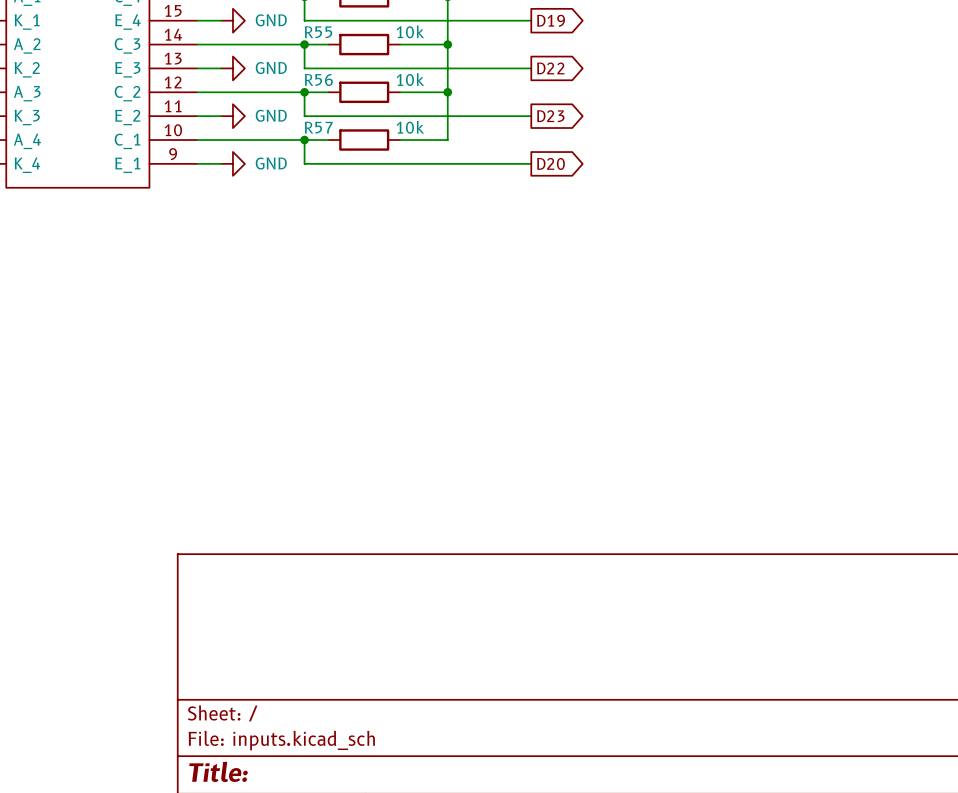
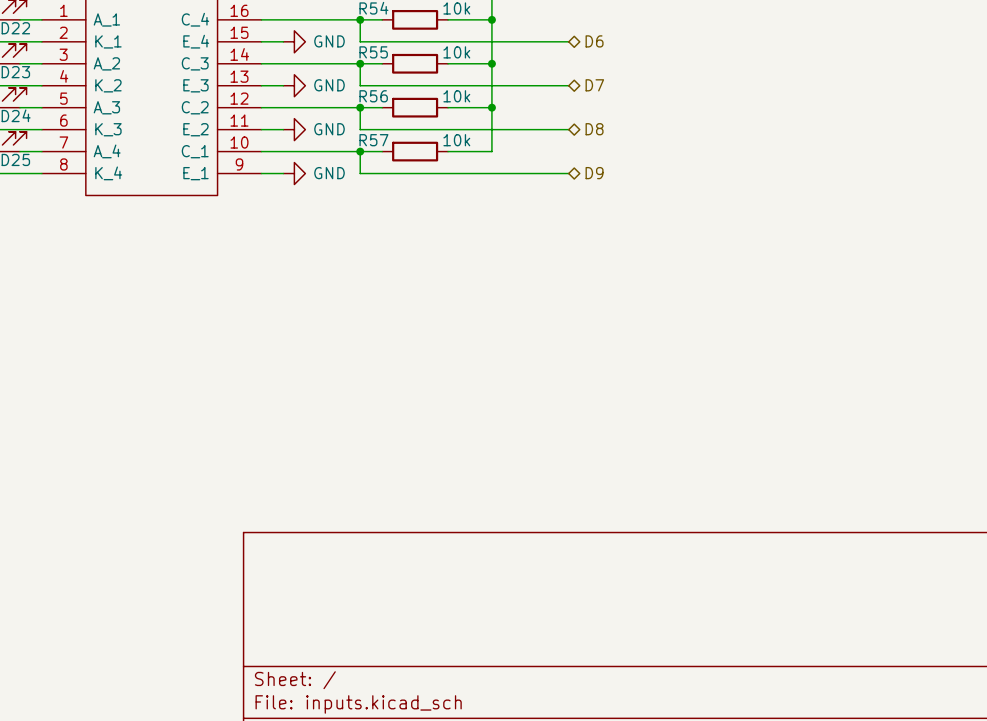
global label: D19 (551, 20) -> none
hierarchical label: none -> D6 (594, 41)
global label: D22 (550, 68) -> none
hierarchical label: none -> D7 (594, 85)
hierarchical label: none -> D8 (594, 129)
global label: D23 (550, 116) -> none
global label: D20 (550, 163) -> none
hierarchical label: none -> D9 (594, 173)

